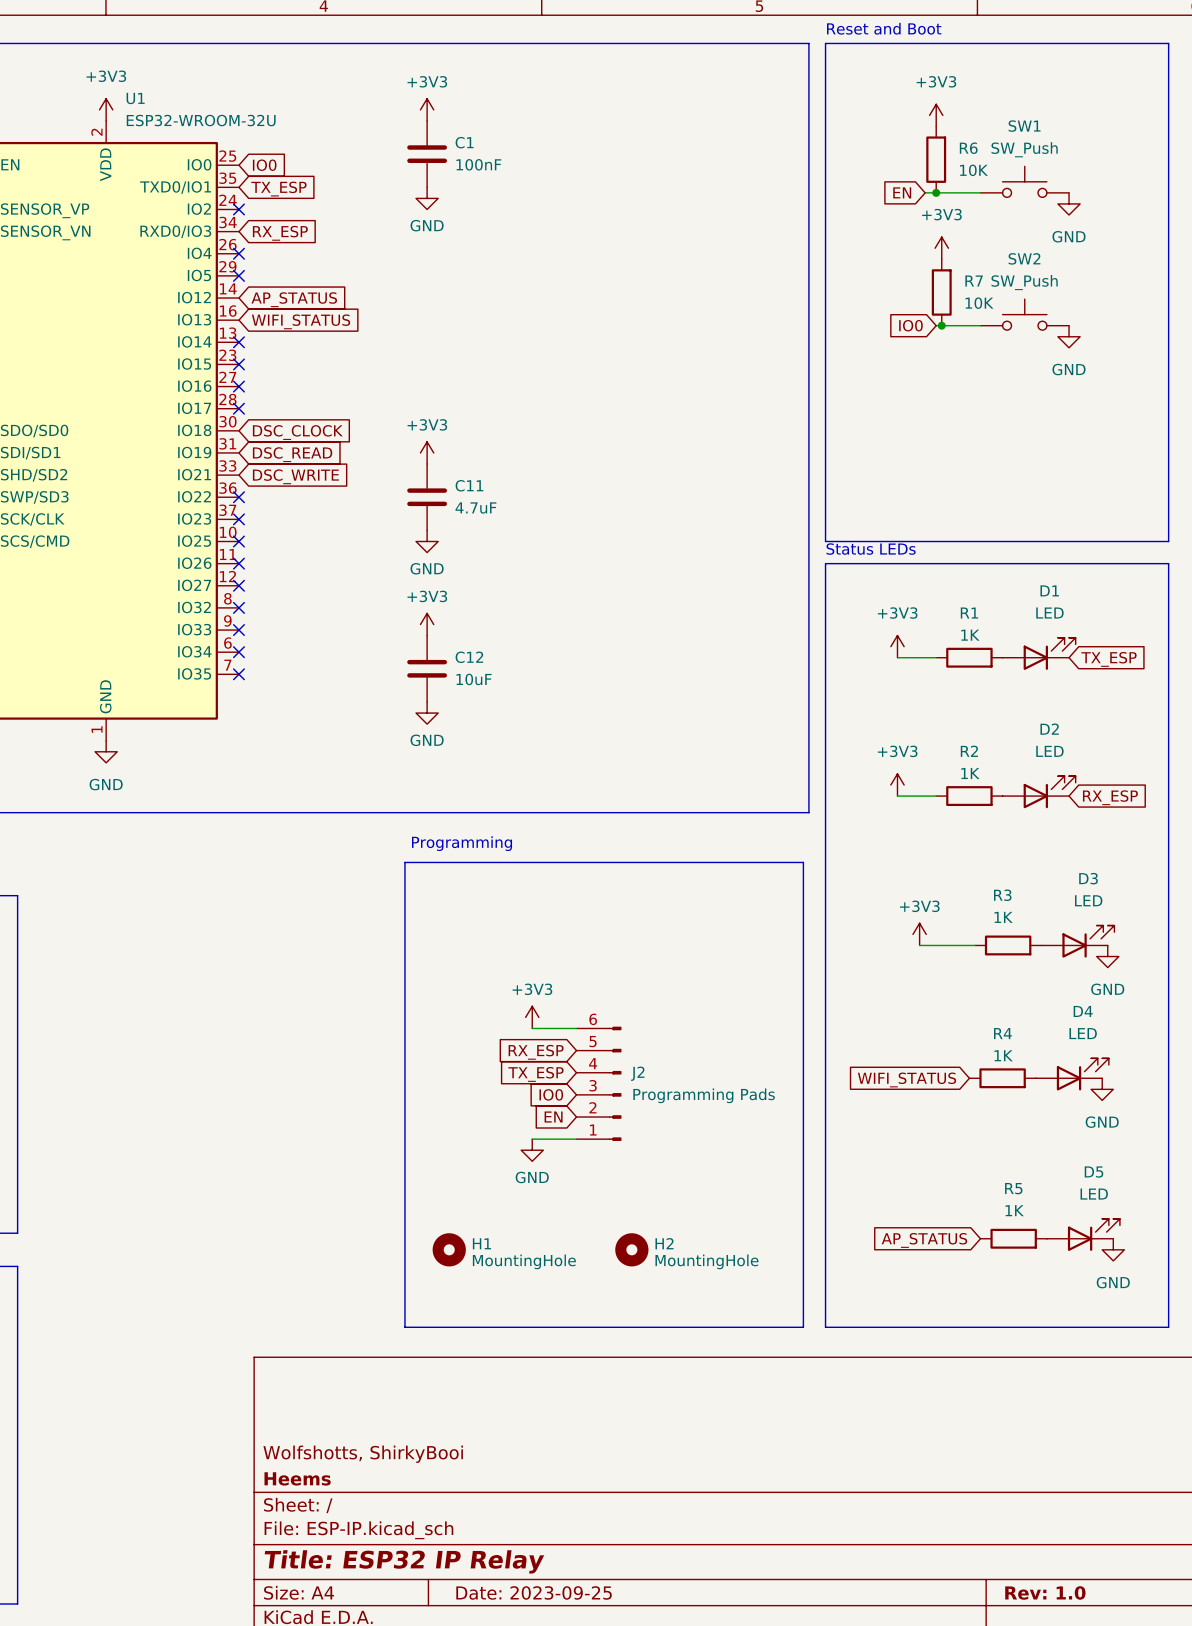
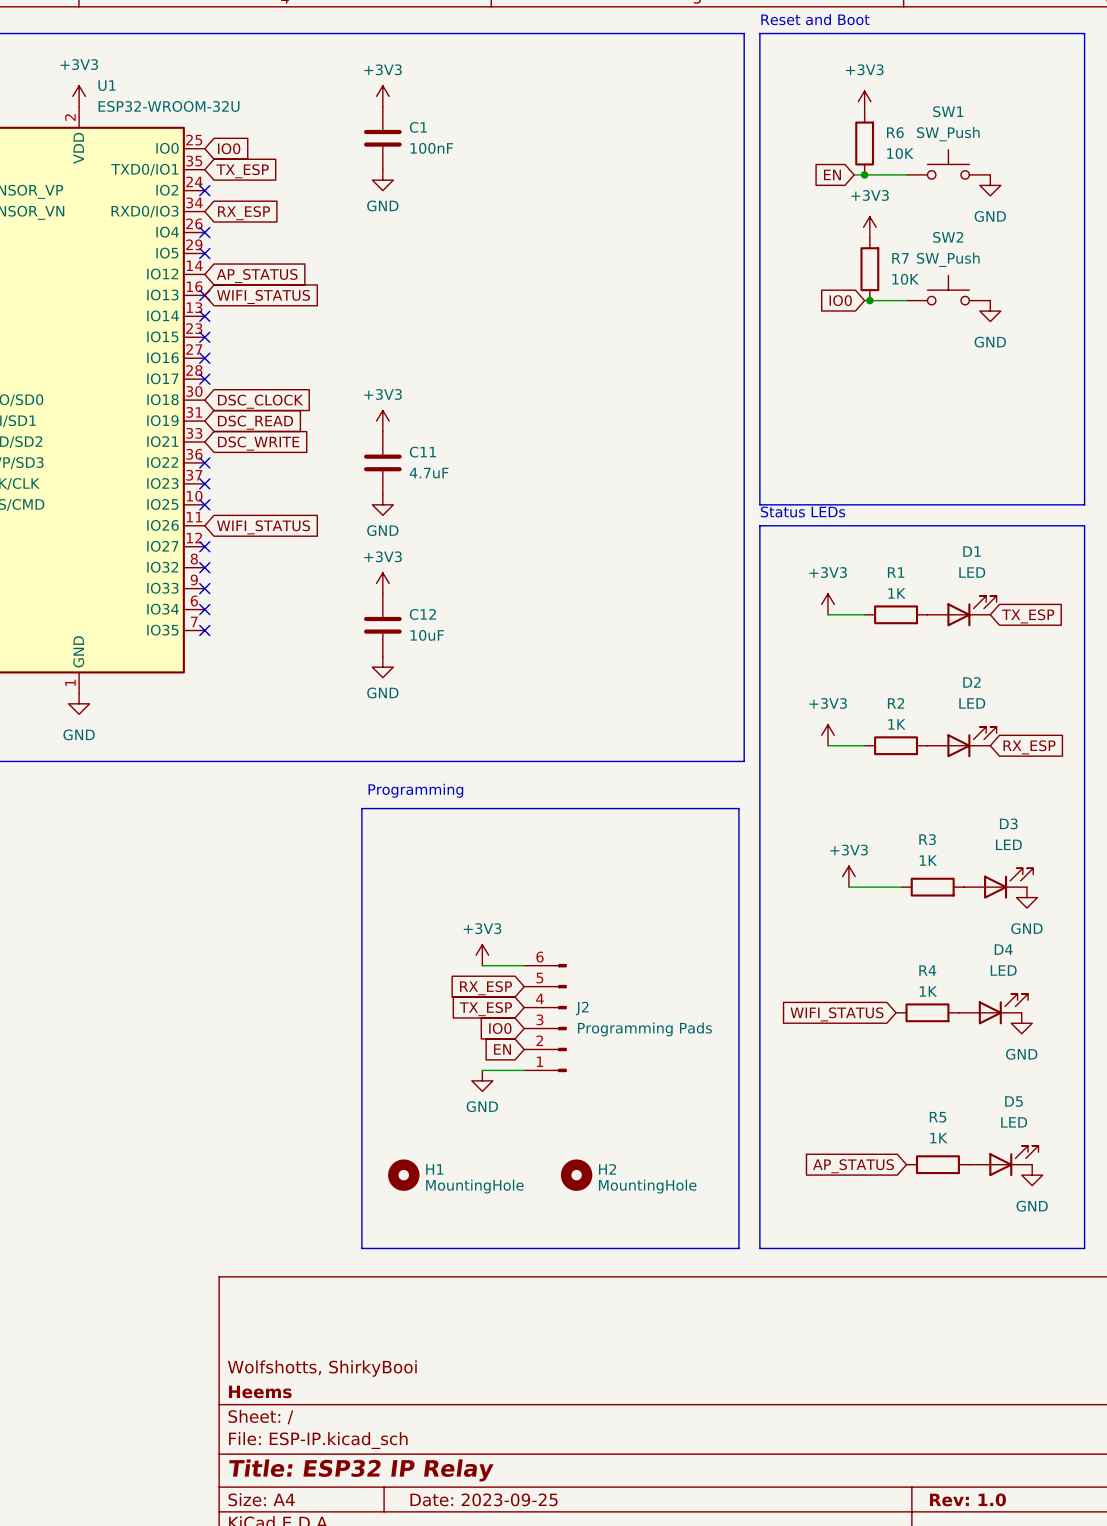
no-connect mark: none -> (204, 295)
no-connect mark: (238, 563) -> none
global label: none -> WIFI_STATUS (263, 527)

